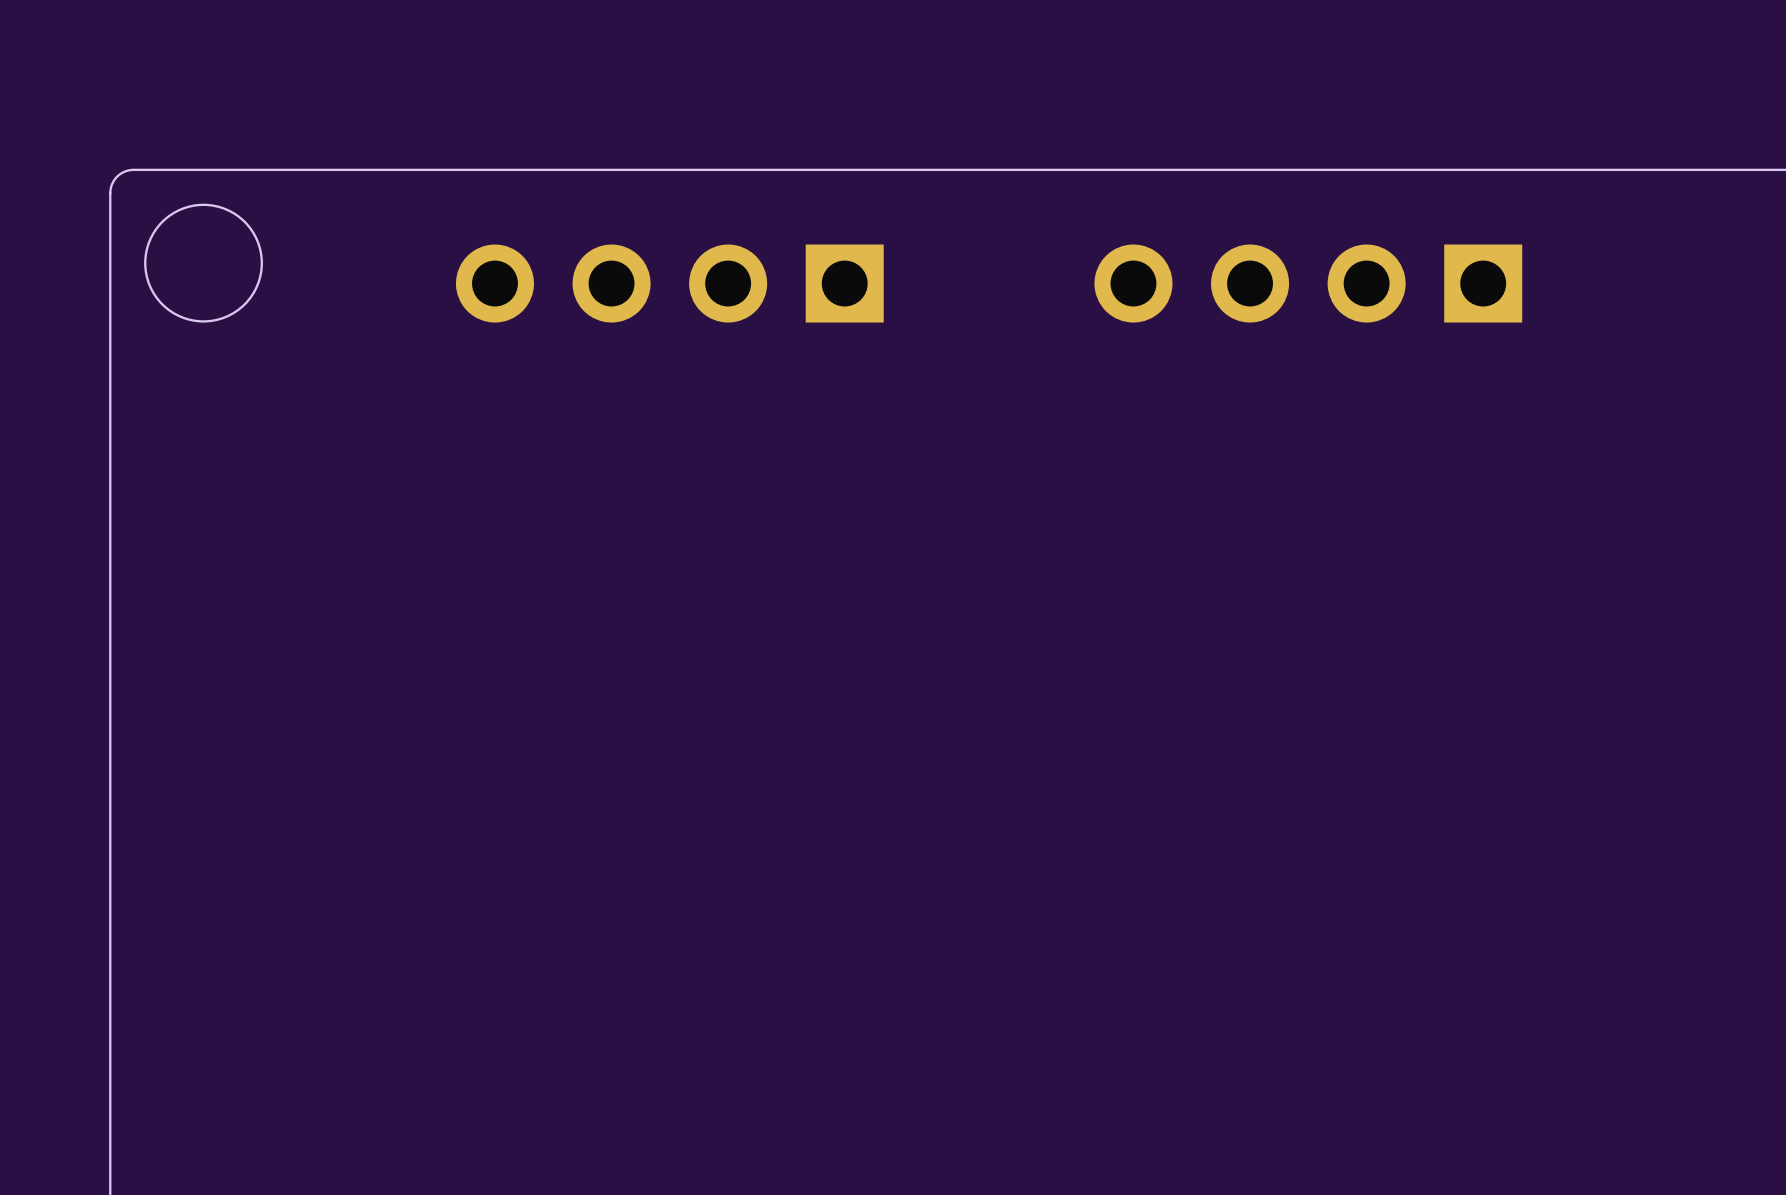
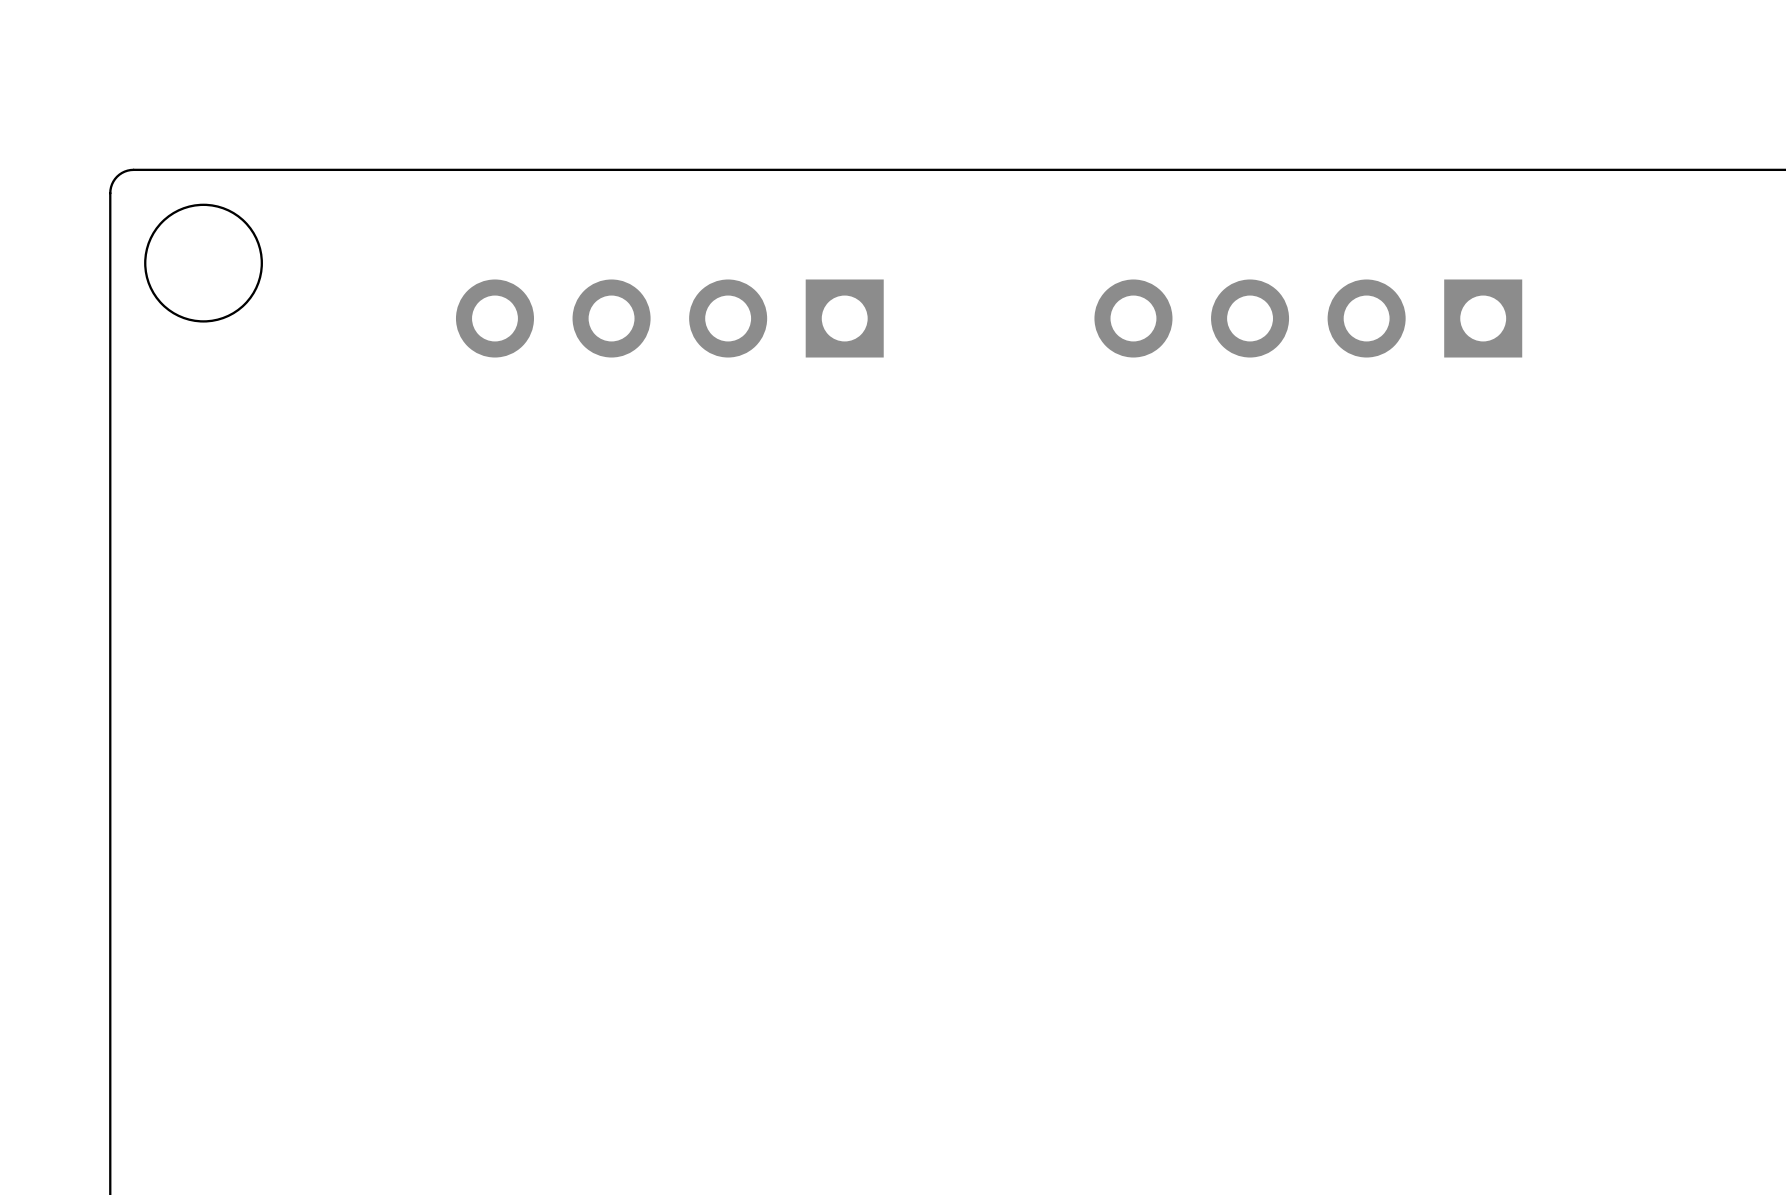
part position: (669, 283) -> (669, 318)
part position: (1308, 283) -> (1308, 318)

